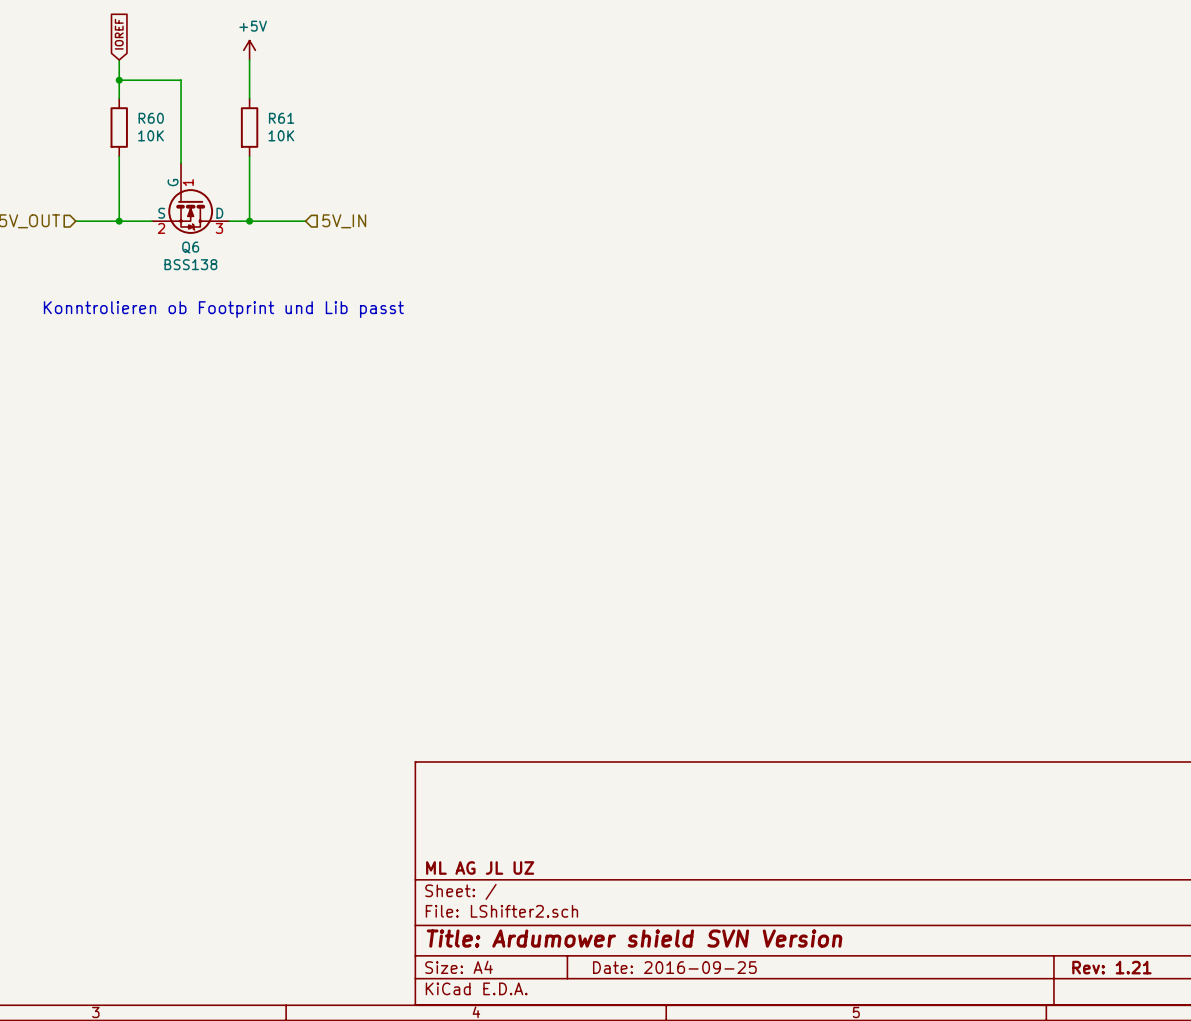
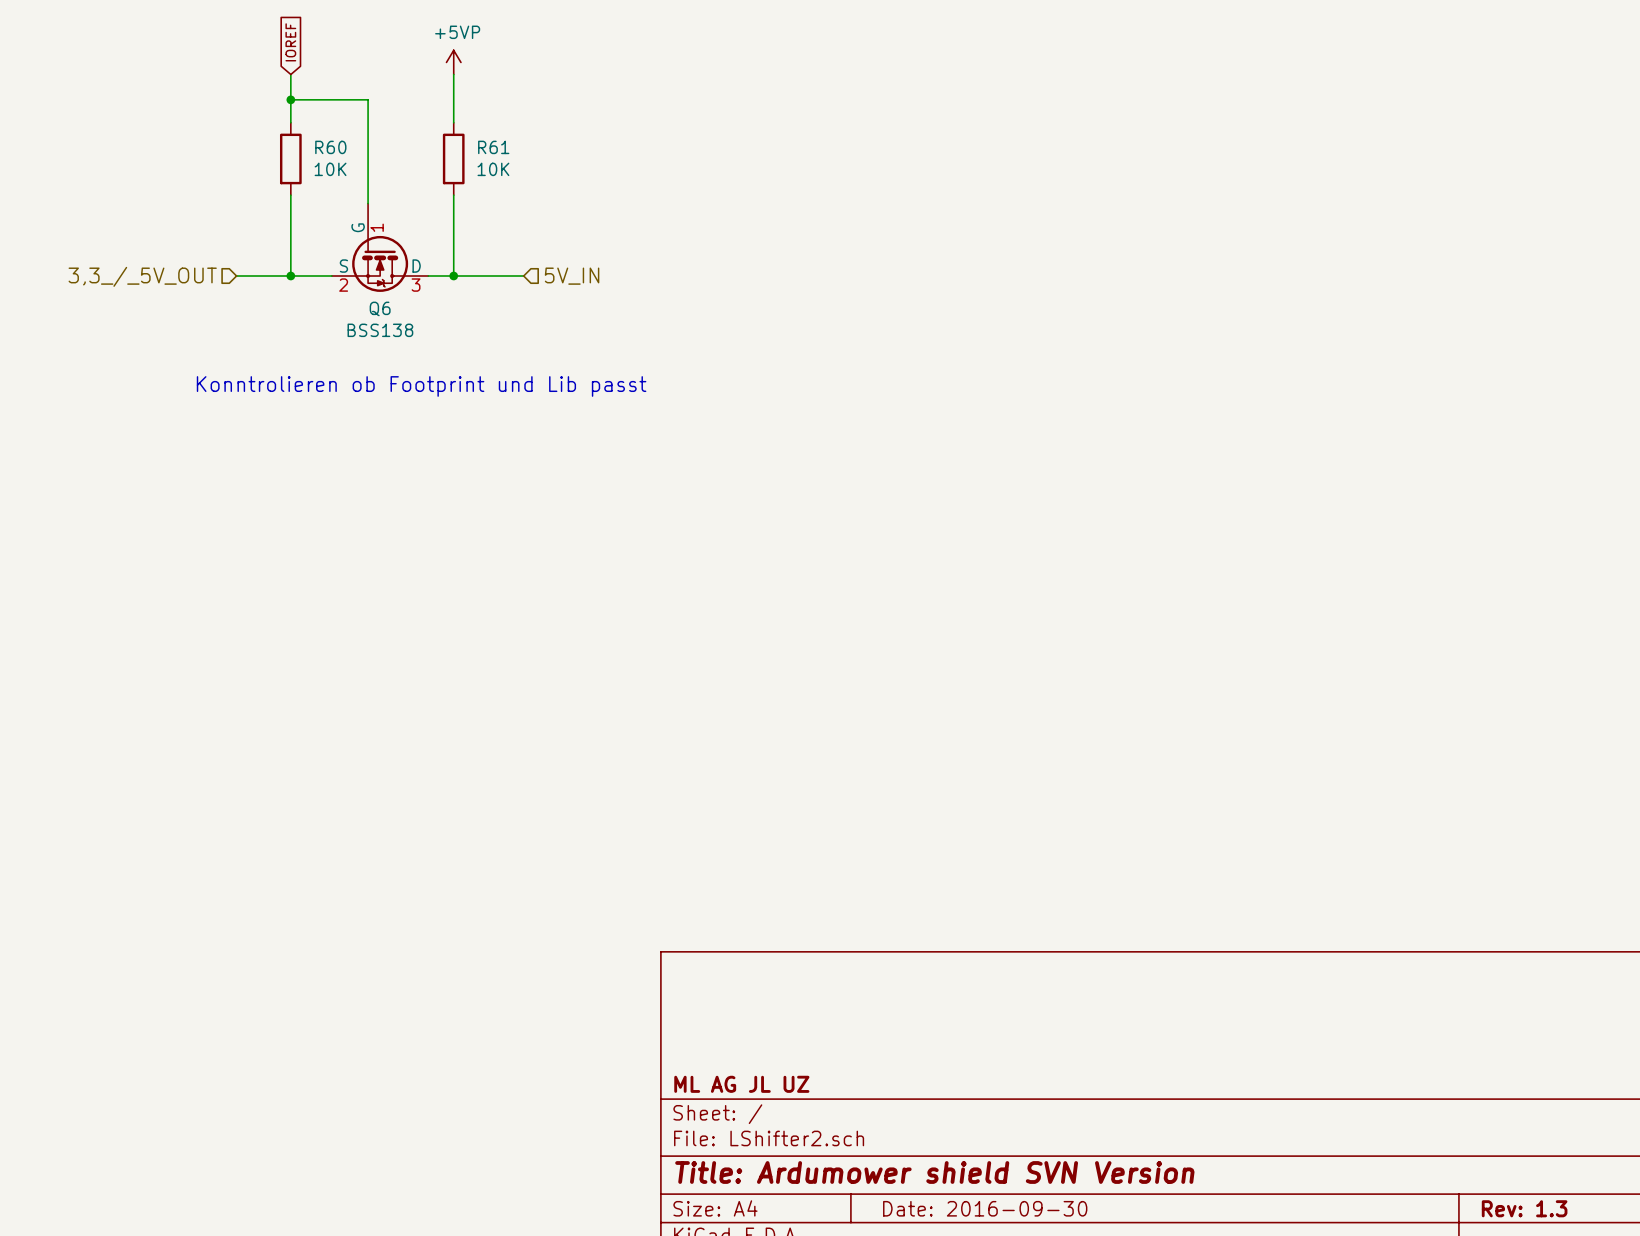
power symbol: +5V (249, 50) -> +5VP (453, 62)
title block: Date: 2016-09-25 (674, 967) -> Date: 2016-09-30 (985, 1208)
title block: Rev: 1.21 (1111, 967) -> Rev: 1.3 (1524, 1208)

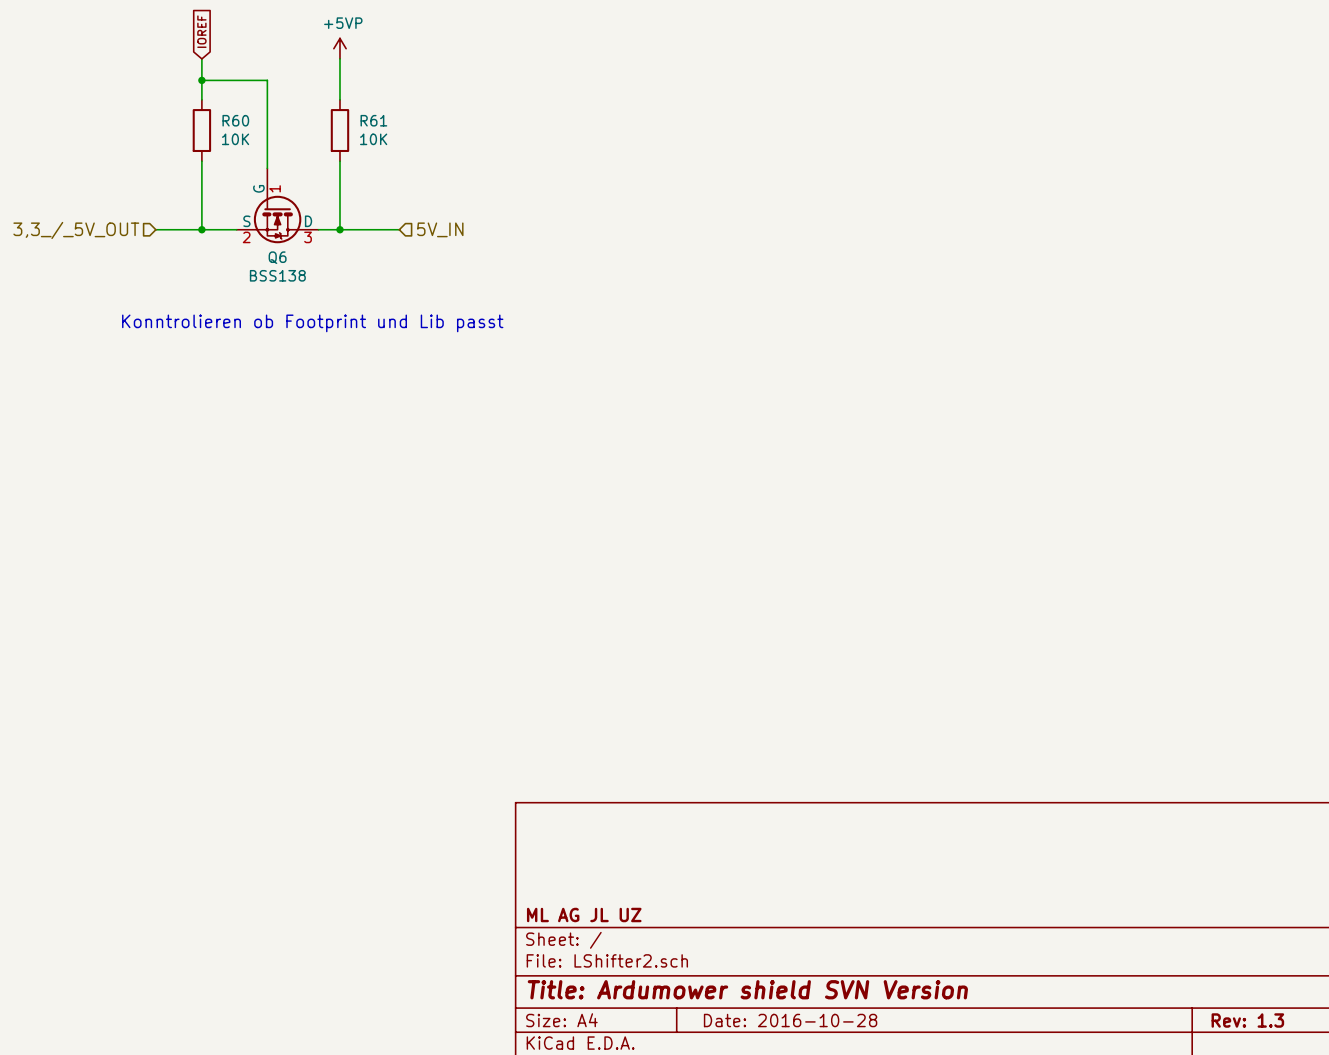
title block: Date: 2016-09-30 (985, 1208) -> Date: 2016-10-28 (790, 1020)

